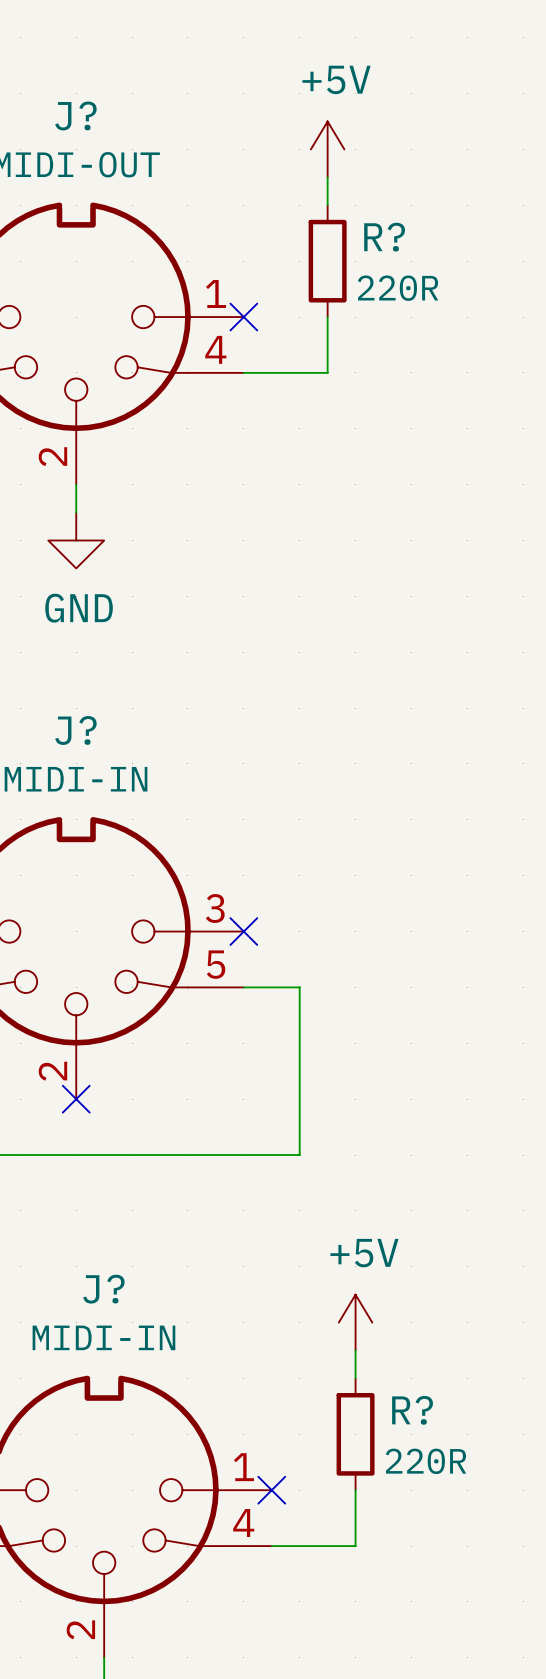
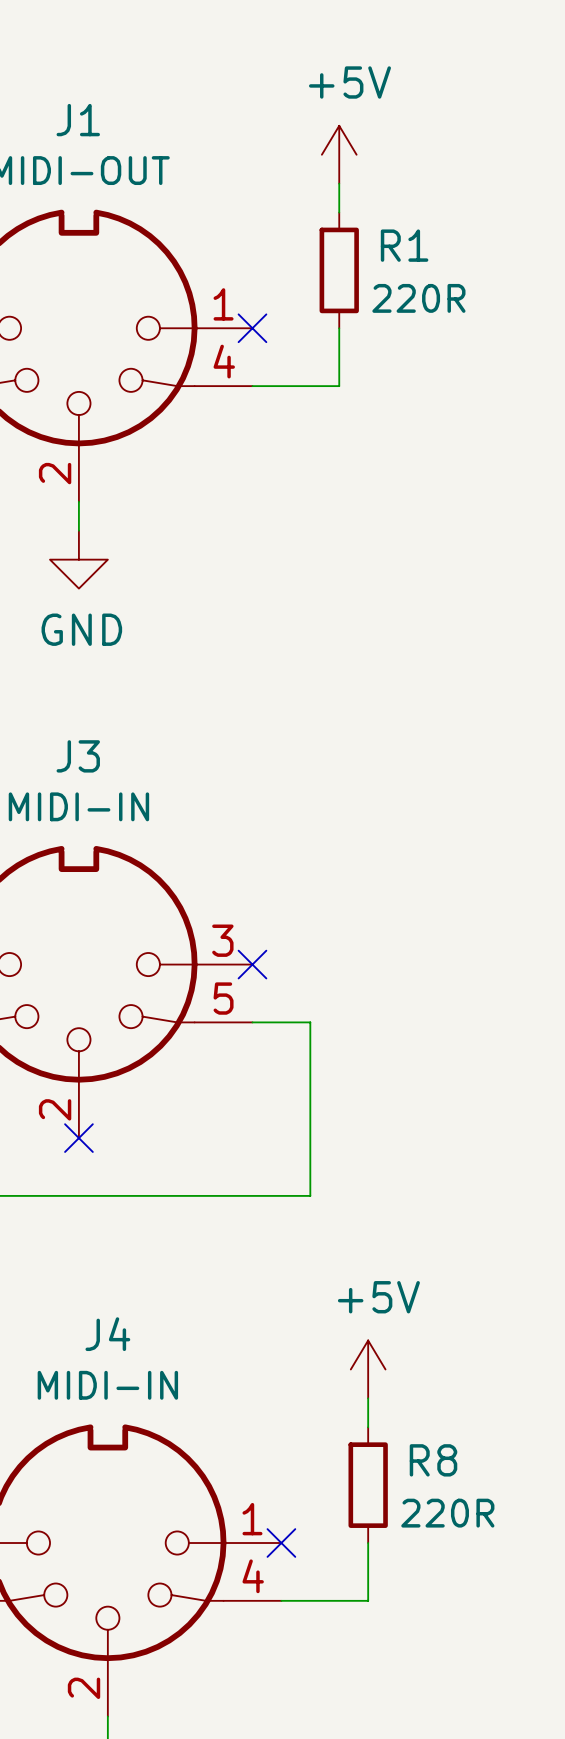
J? name: J? (75, 115) -> J1 (78, 120)
R? name: R? (384, 237) -> R1 (404, 245)
J? name: J? (75, 730) -> J3 (78, 756)
J? name: J? (103, 1289) -> J4 (107, 1334)
R? name: R? (412, 1410) -> R8 (433, 1460)

